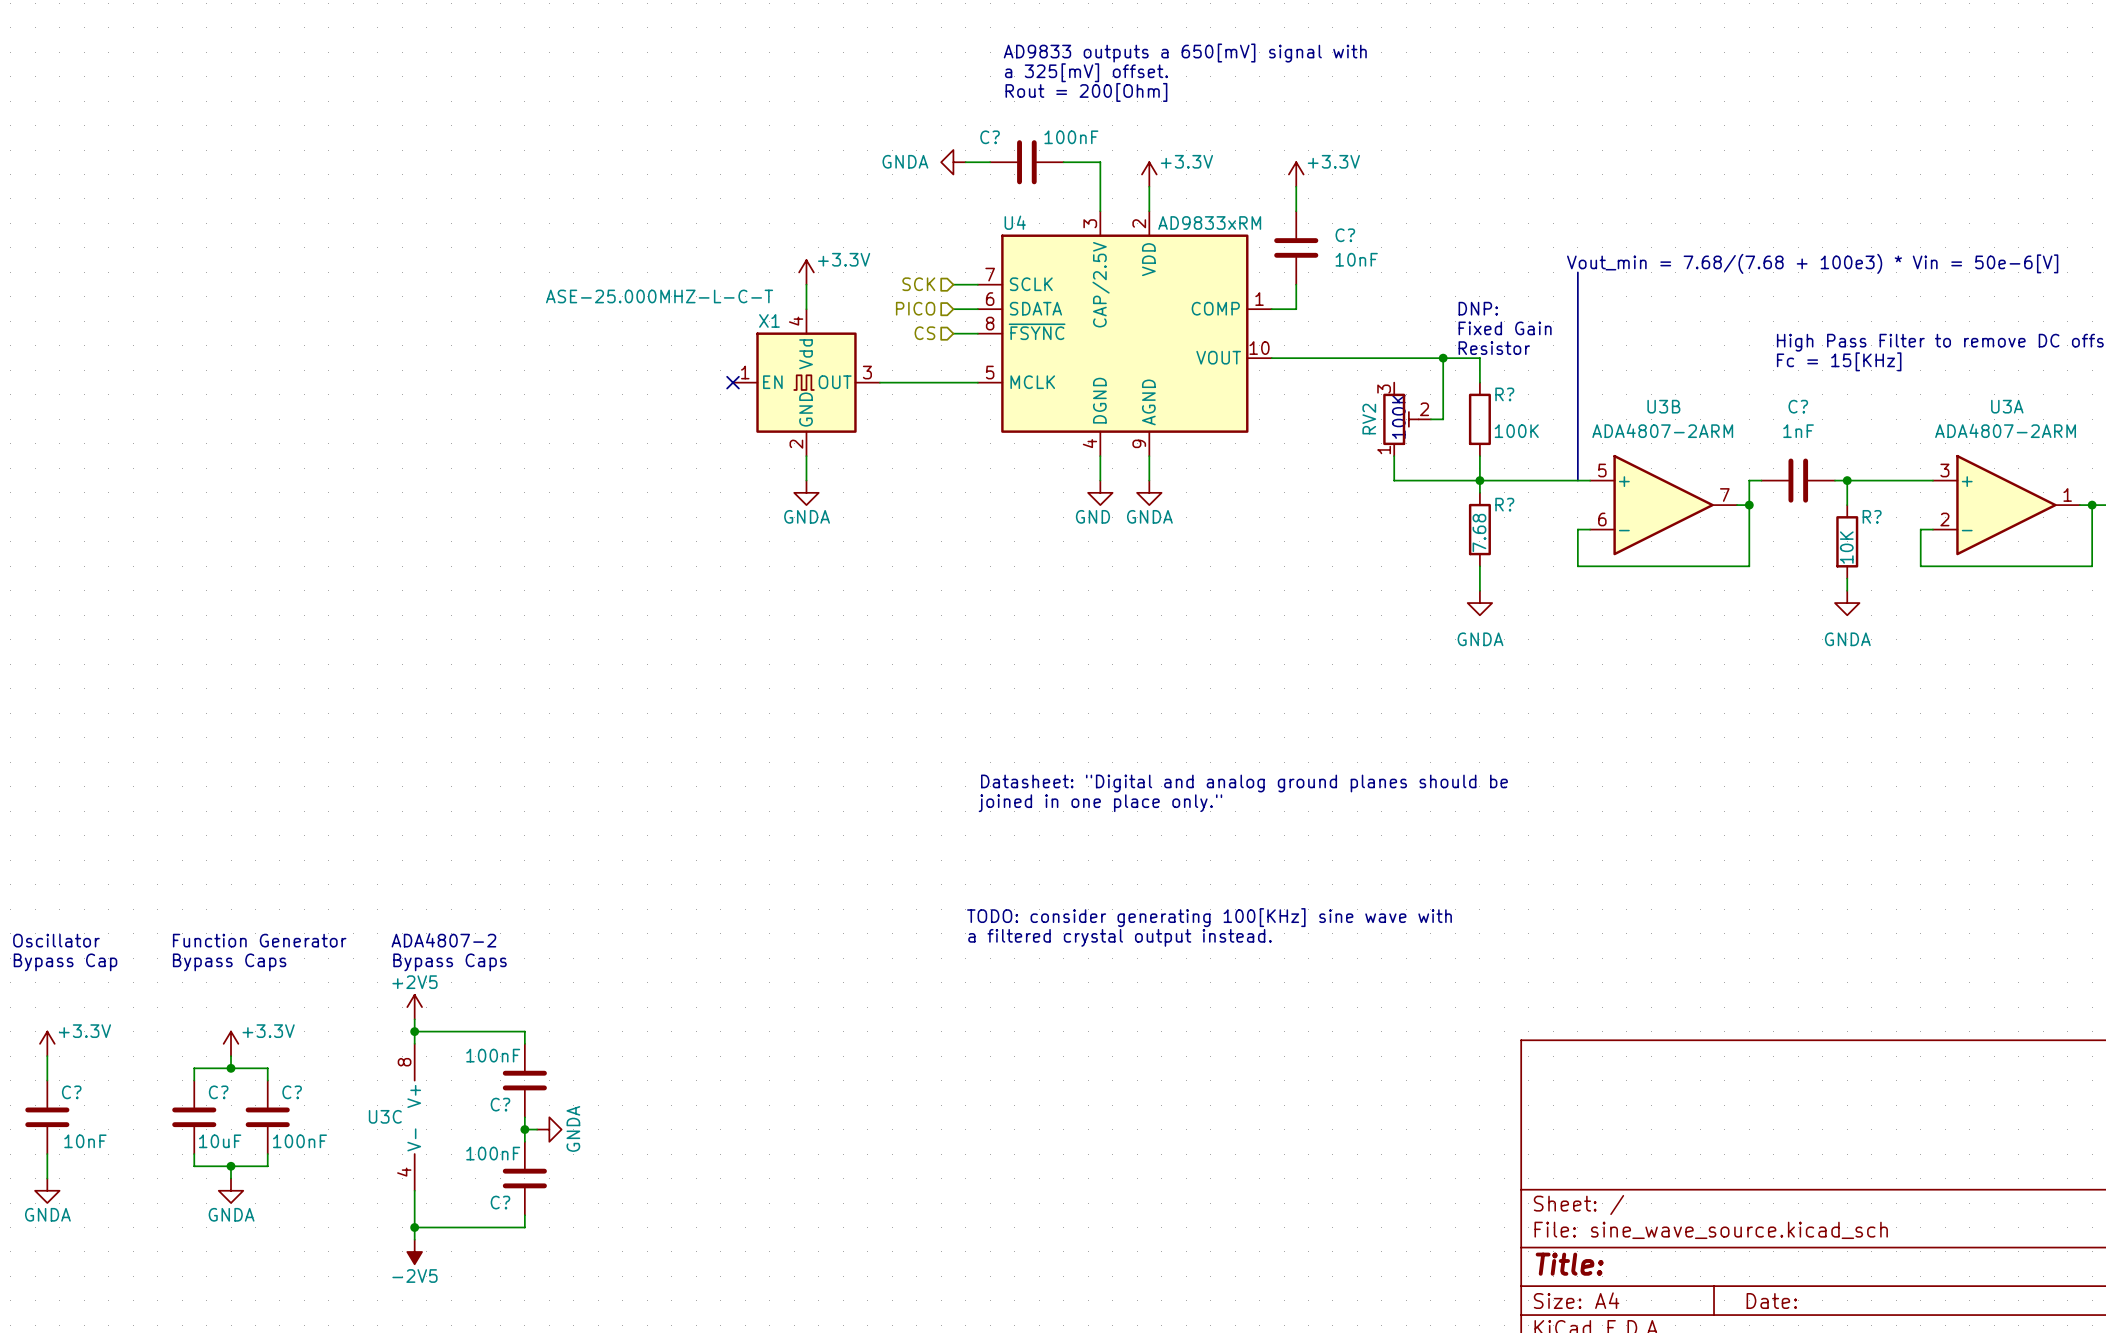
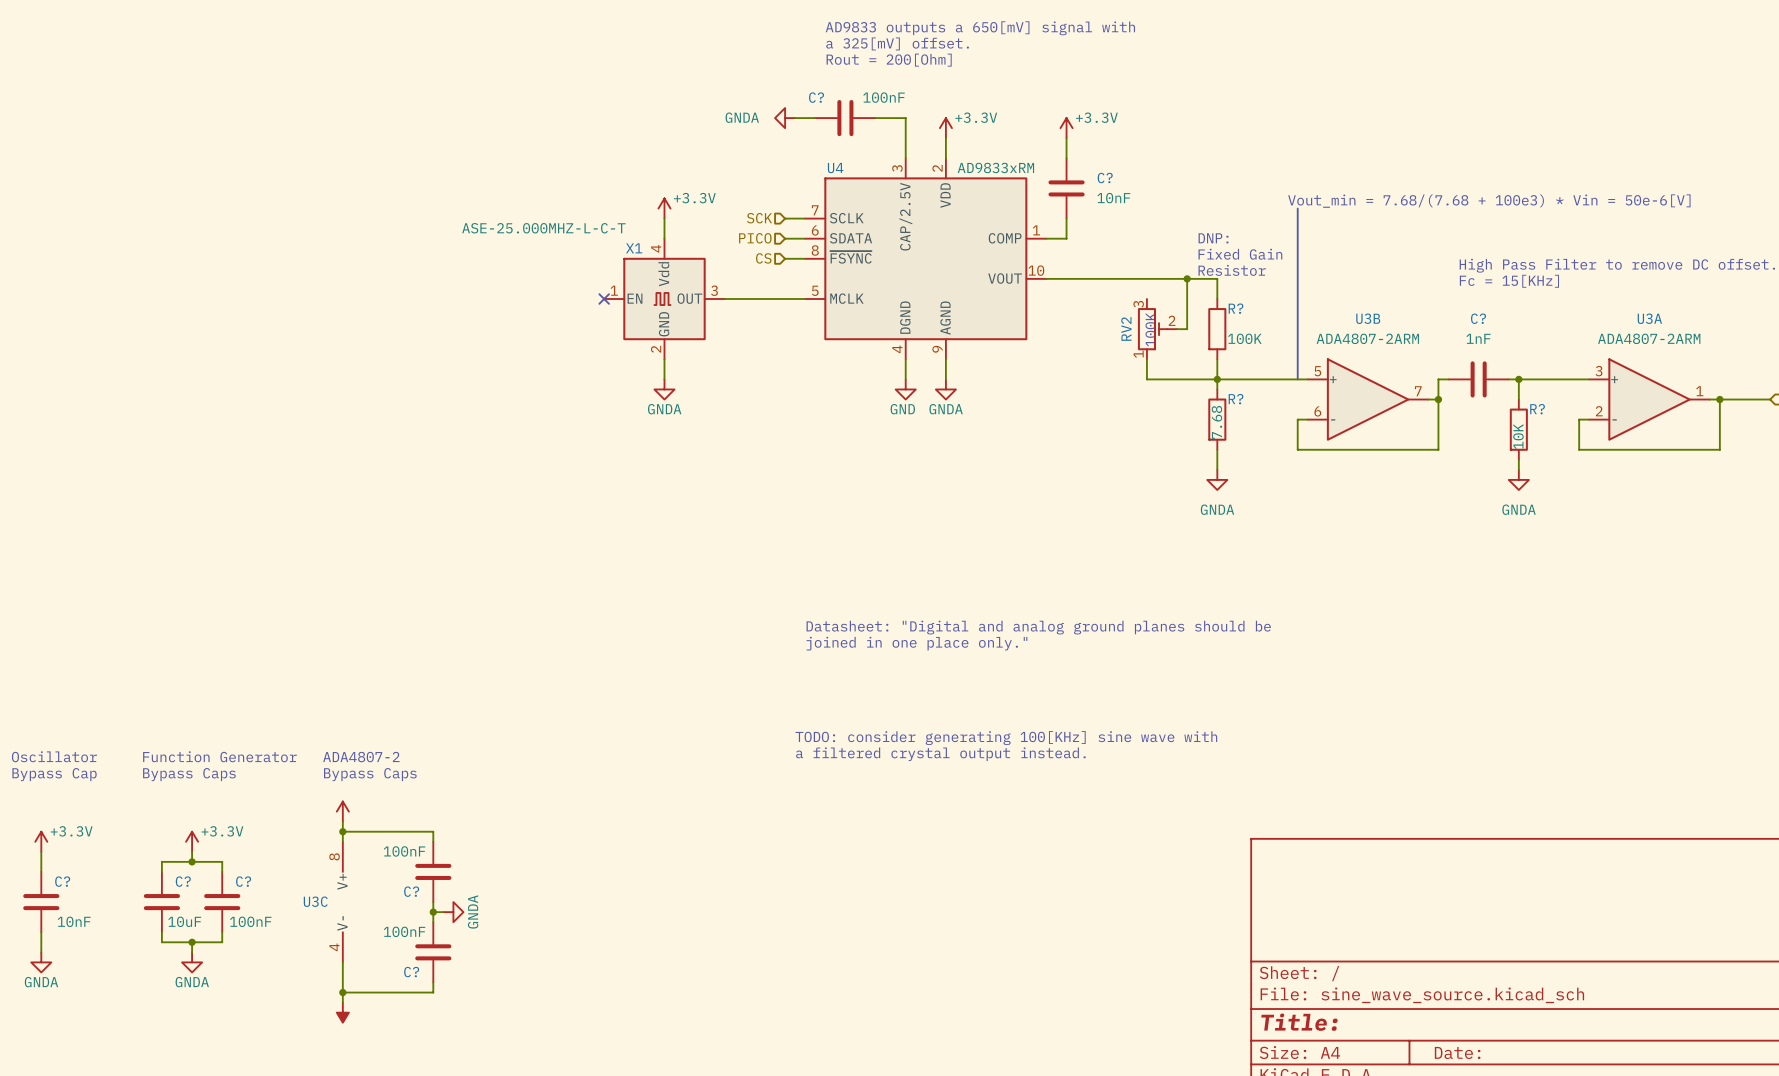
power symbol text: +2V5 (414, 982) -> none
power symbol text: -2V5 (414, 1276) -> none

